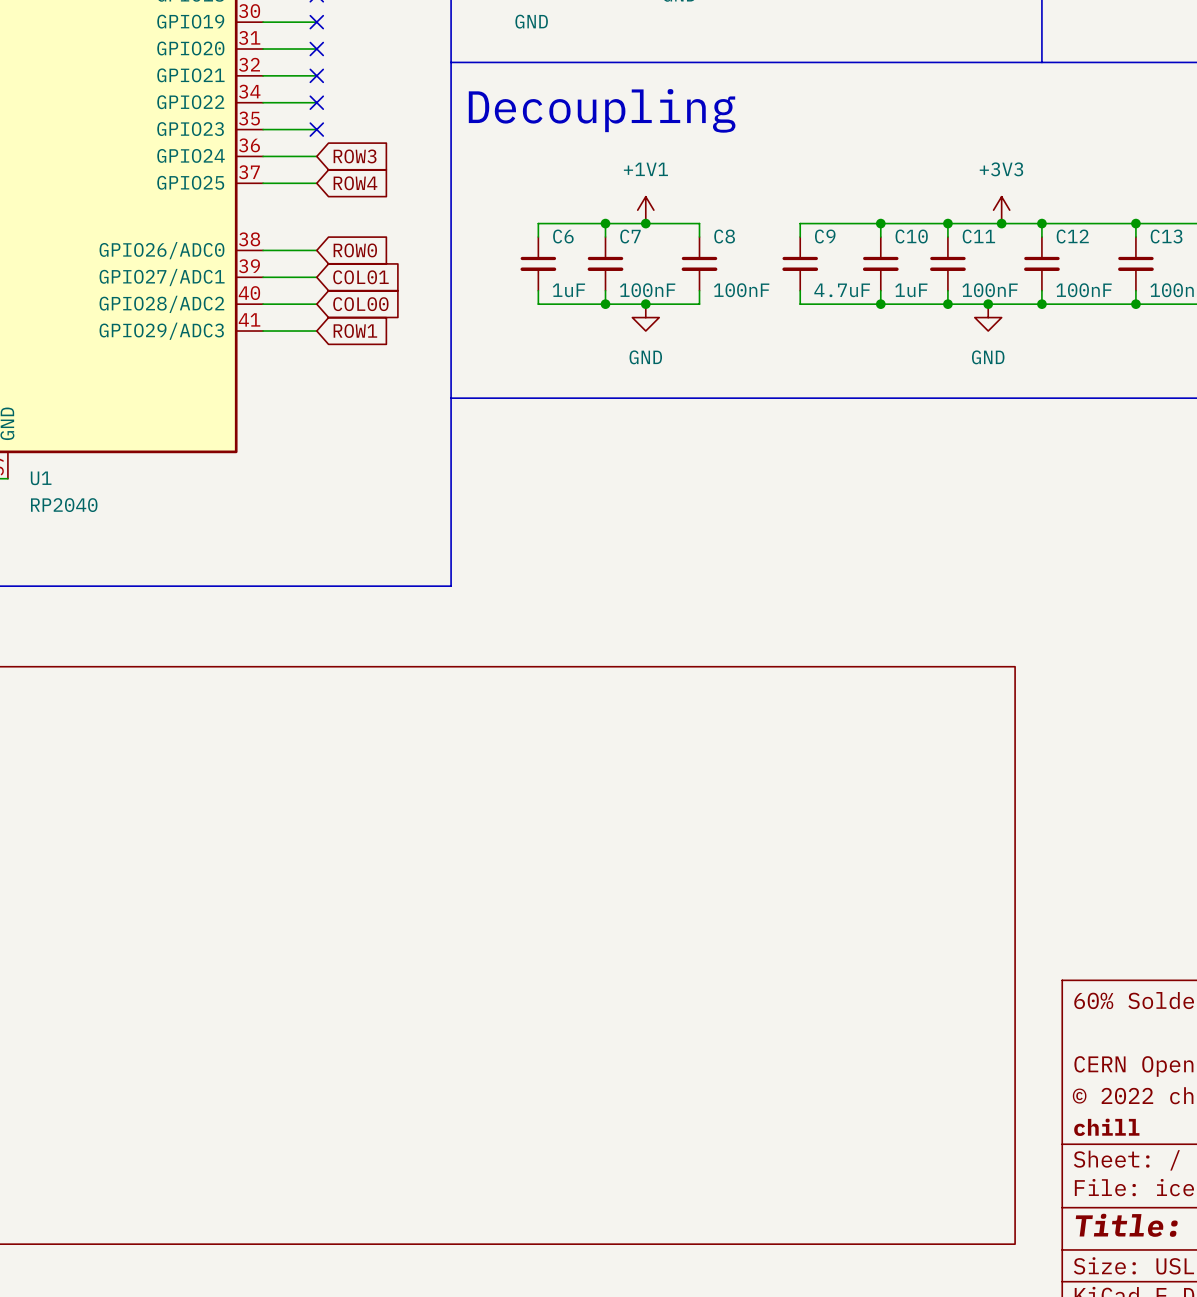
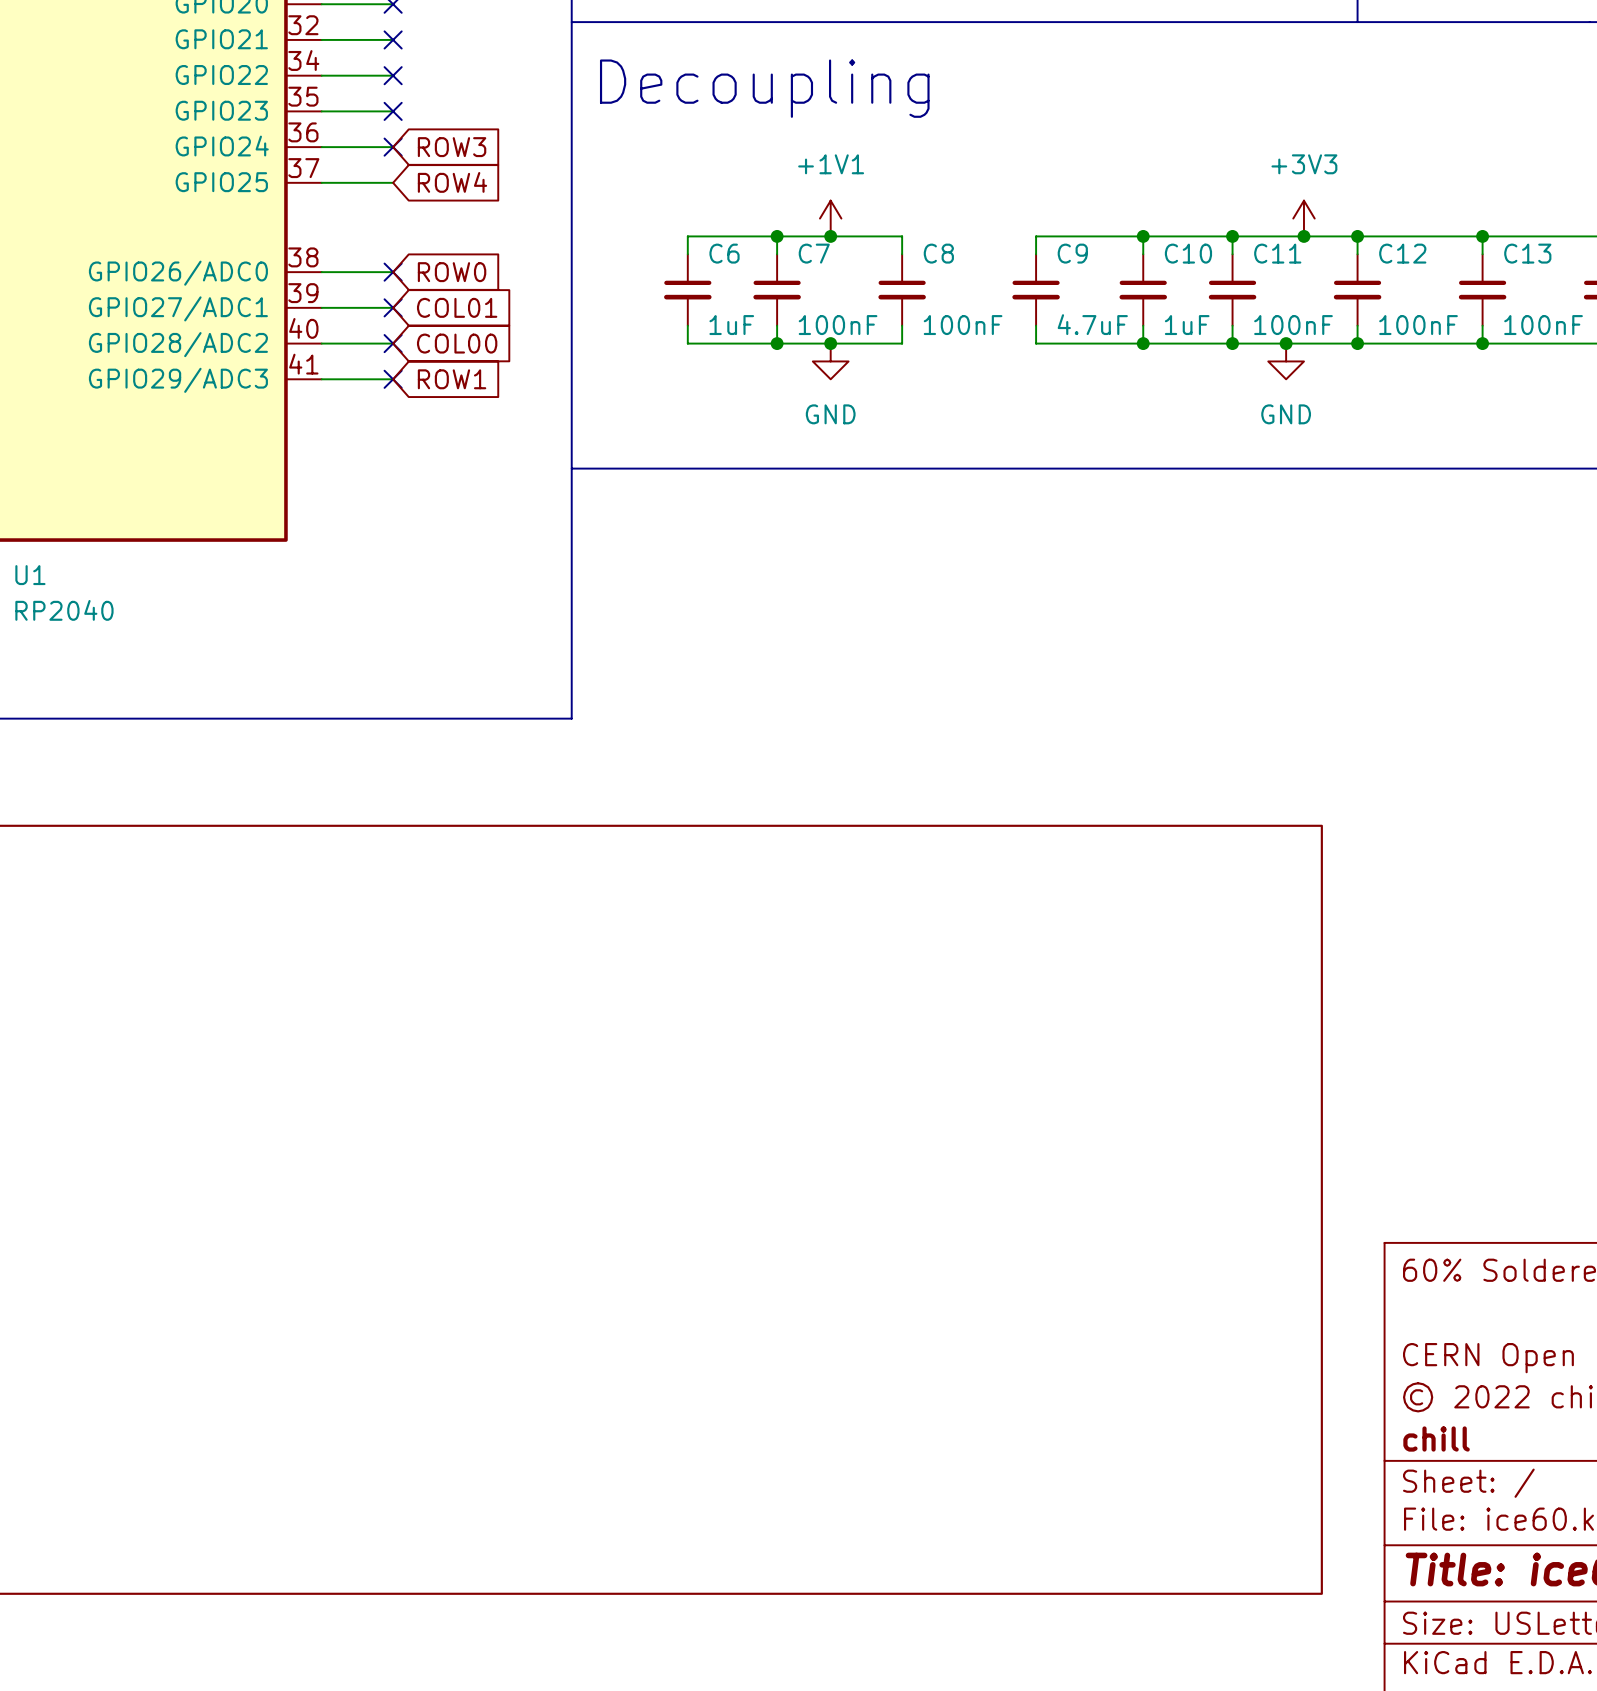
no-connect mark: none -> (393, 147)
no-connect mark: none -> (393, 272)
no-connect mark: none -> (393, 307)
no-connect mark: none -> (393, 343)
no-connect mark: none -> (393, 379)

